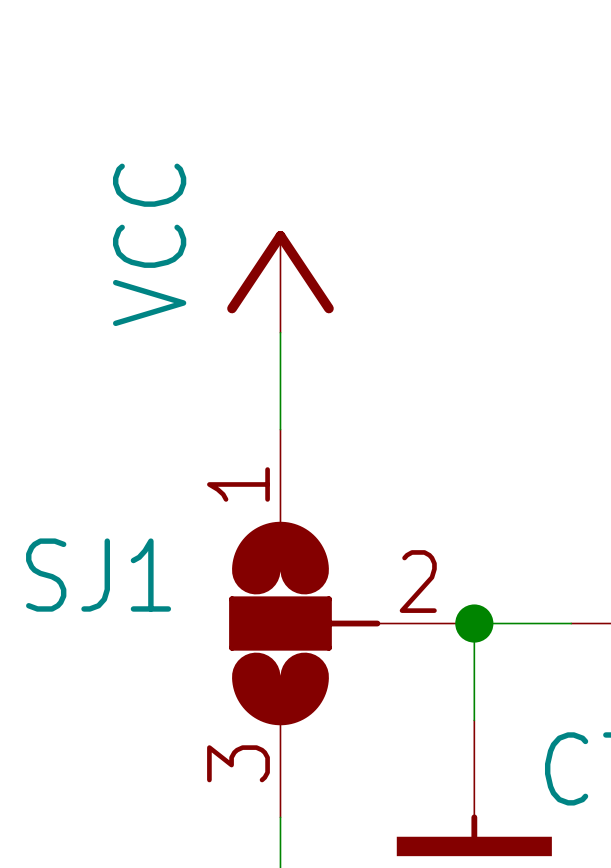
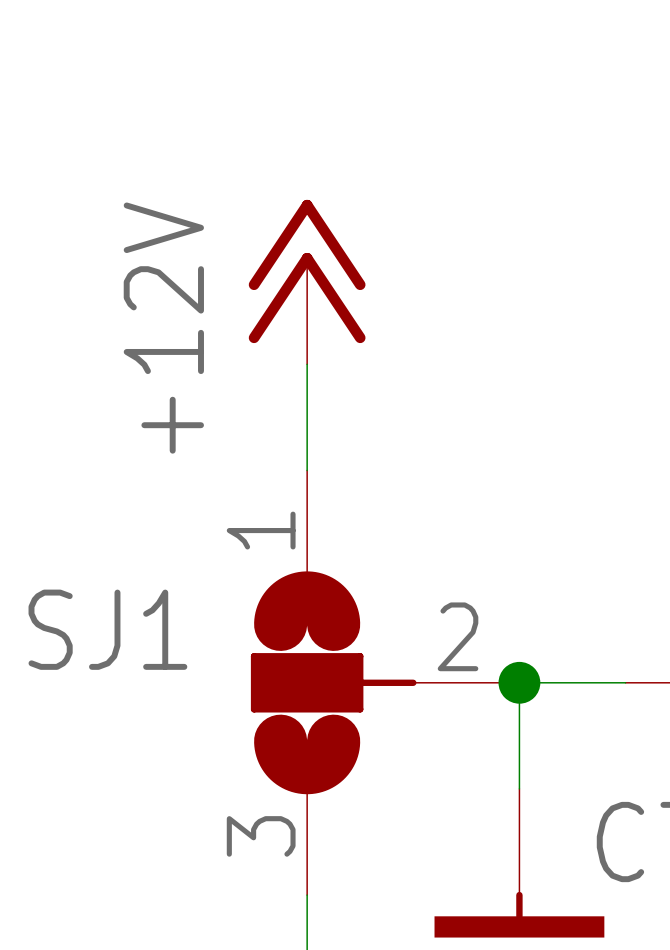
power symbol: VCC (280, 281) -> +12V (307, 282)

